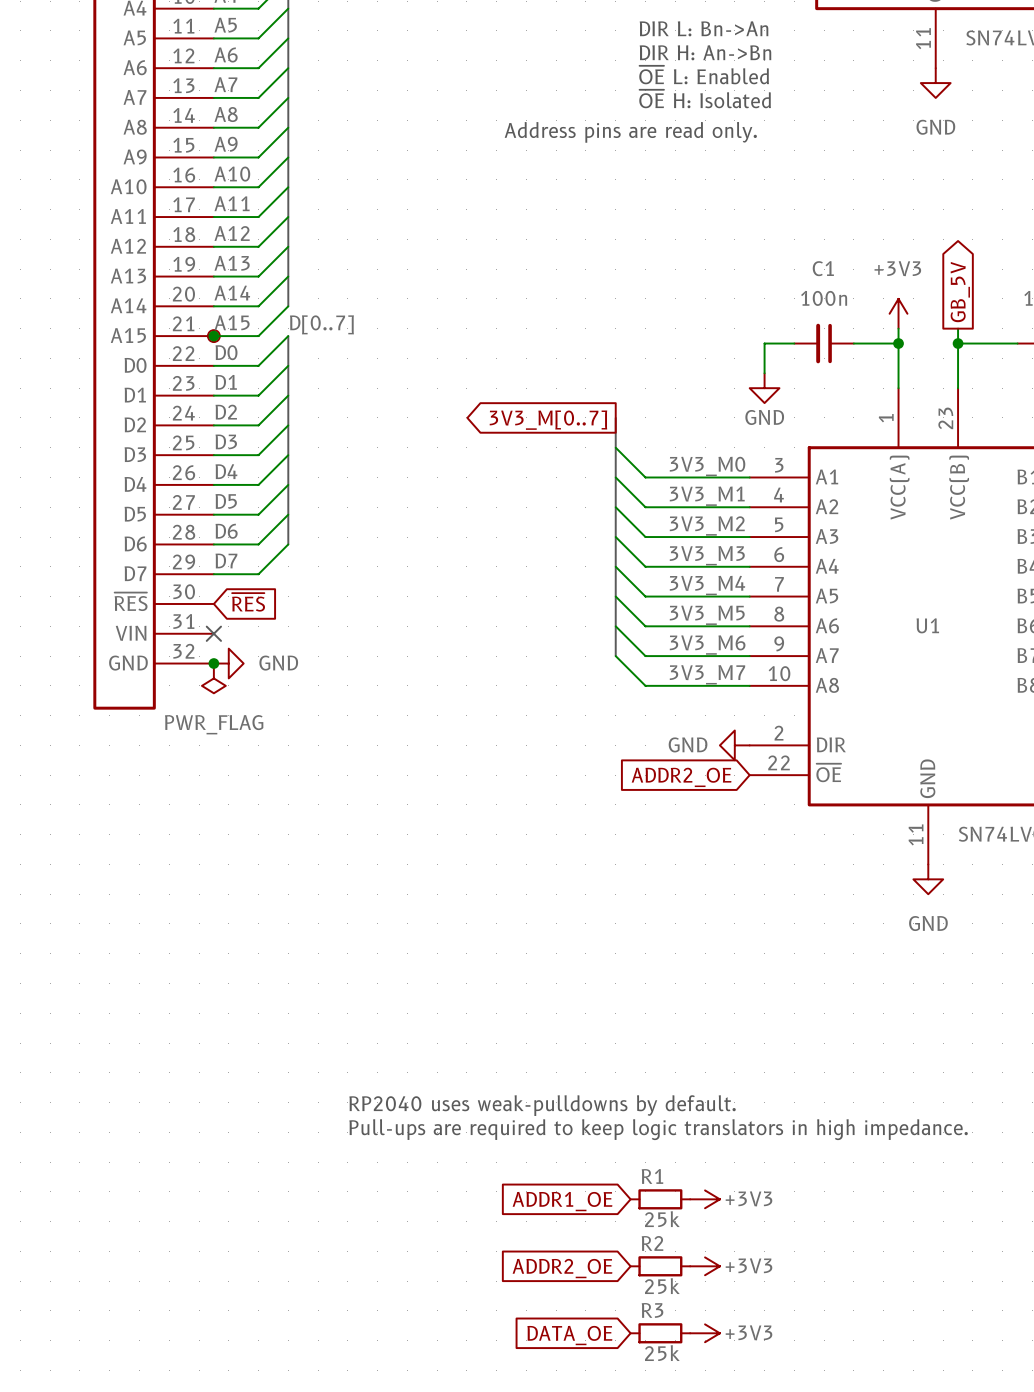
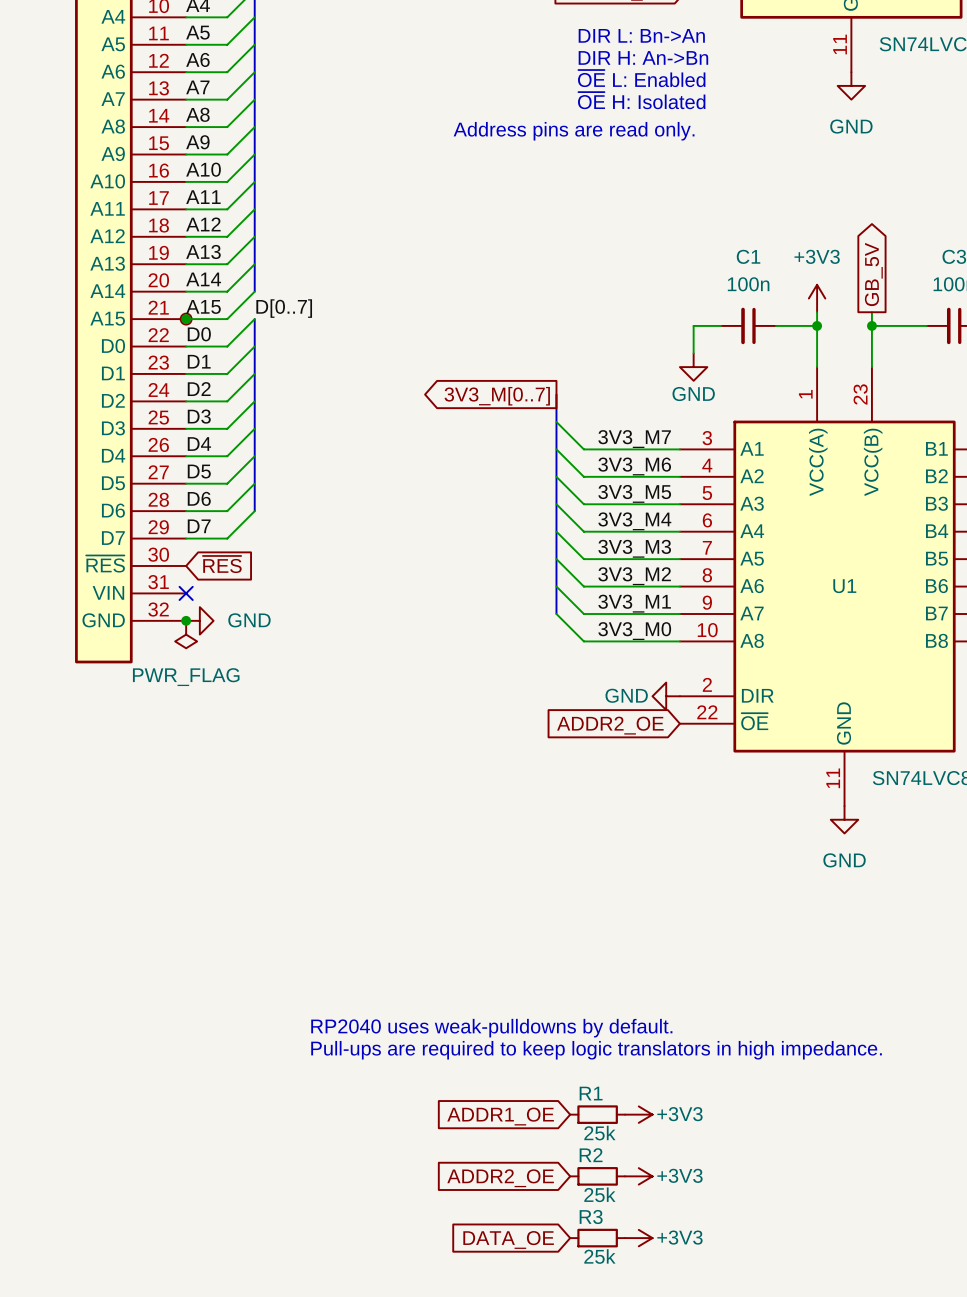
label: 3V3_M0 (707, 466) -> 3V3_M7 (634, 439)
label: 3V3_M1 (707, 496) -> 3V3_M6 (634, 466)
label: 3V3_M2 (707, 525) -> 3V3_M5 (634, 493)
label: 3V3_M3 (707, 555) -> 3V3_M4 (634, 521)
label: 3V3_M4 (707, 585) -> 3V3_M3 (634, 548)
label: 3V3_M5 (707, 615) -> 3V3_M2 (634, 576)
label: 3V3_M6 (707, 645) -> 3V3_M1 (634, 603)
label: 3V3_M7 (707, 674) -> 3V3_M0 (634, 631)

